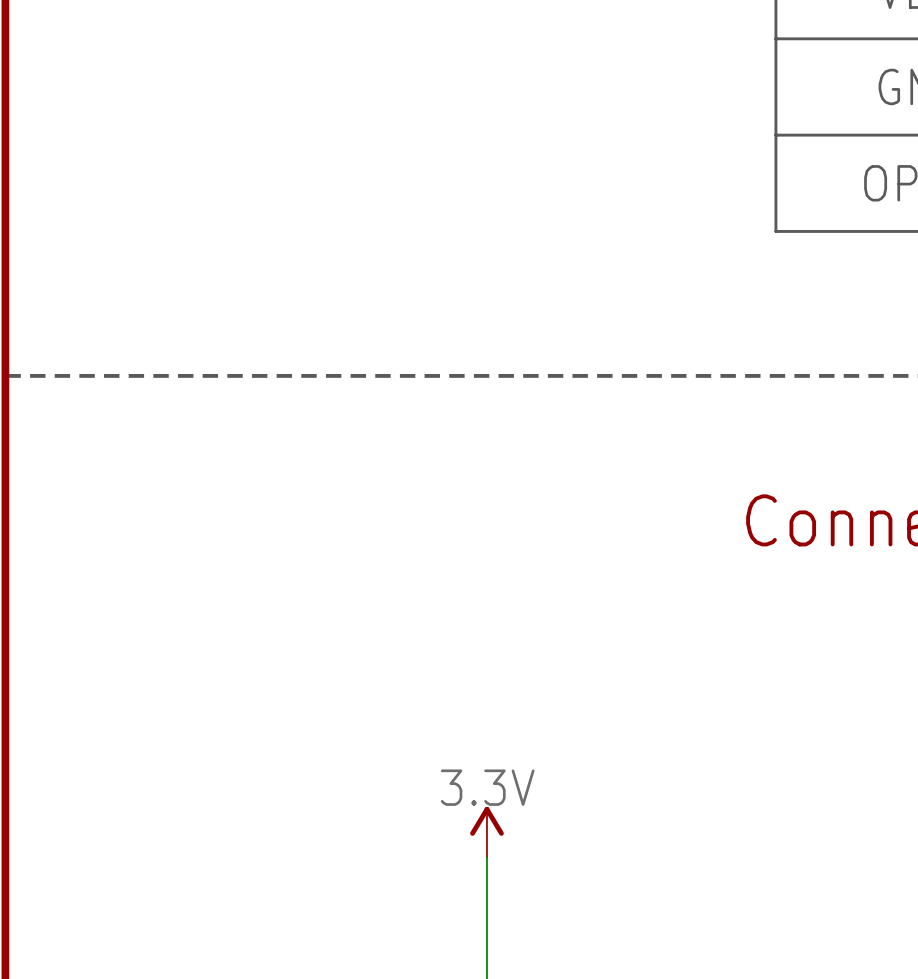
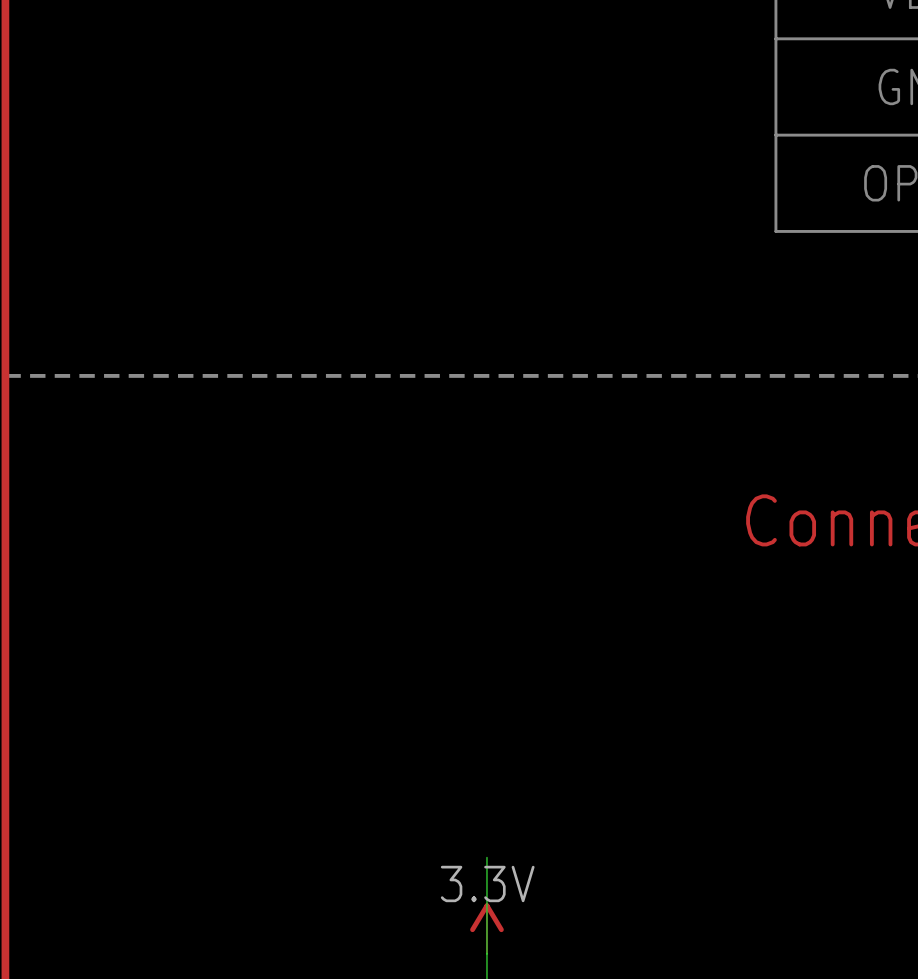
power symbol position: 3.3V (486, 832) -> 3.3V (486, 928)

